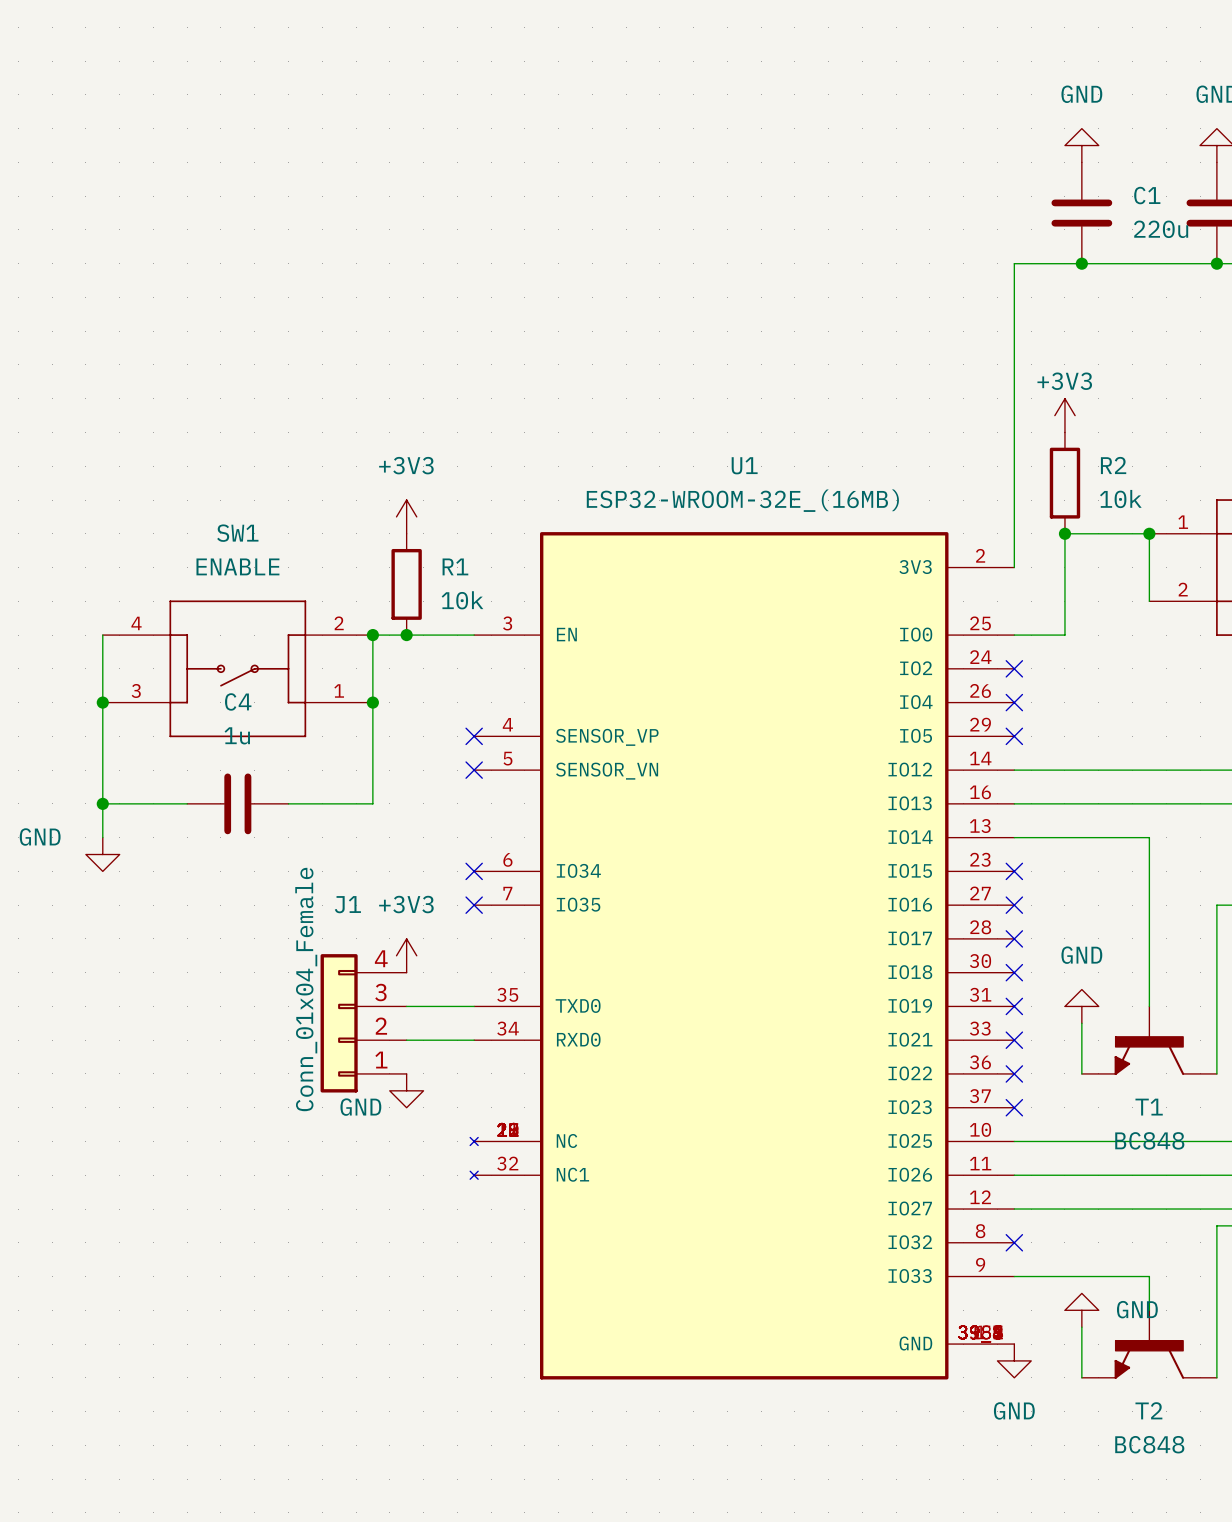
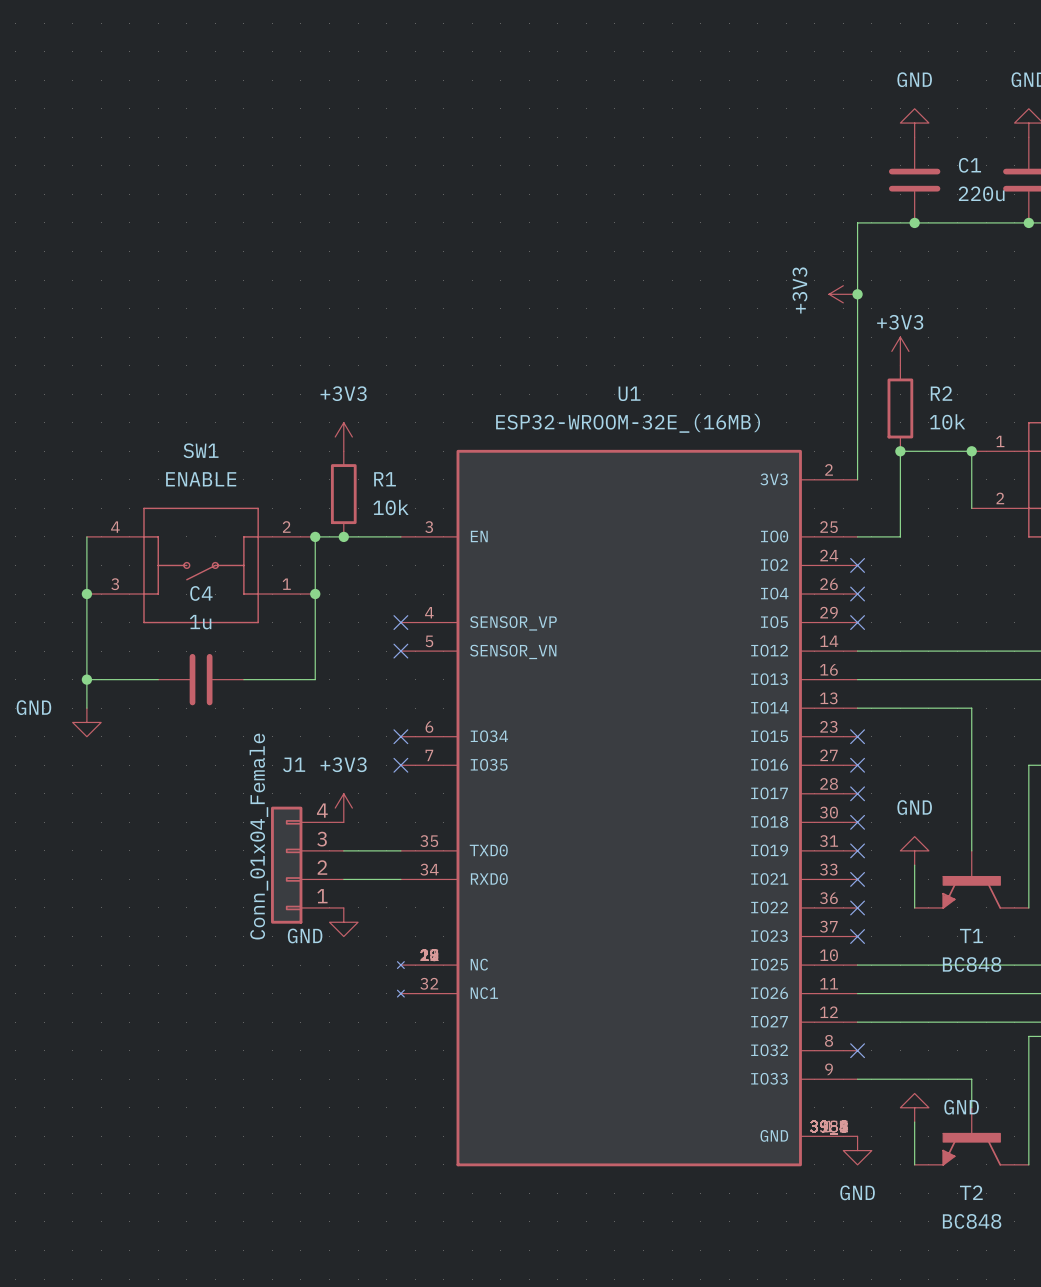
power symbol: none -> +3V3 (843, 294)
junction: none -> (857, 294)

